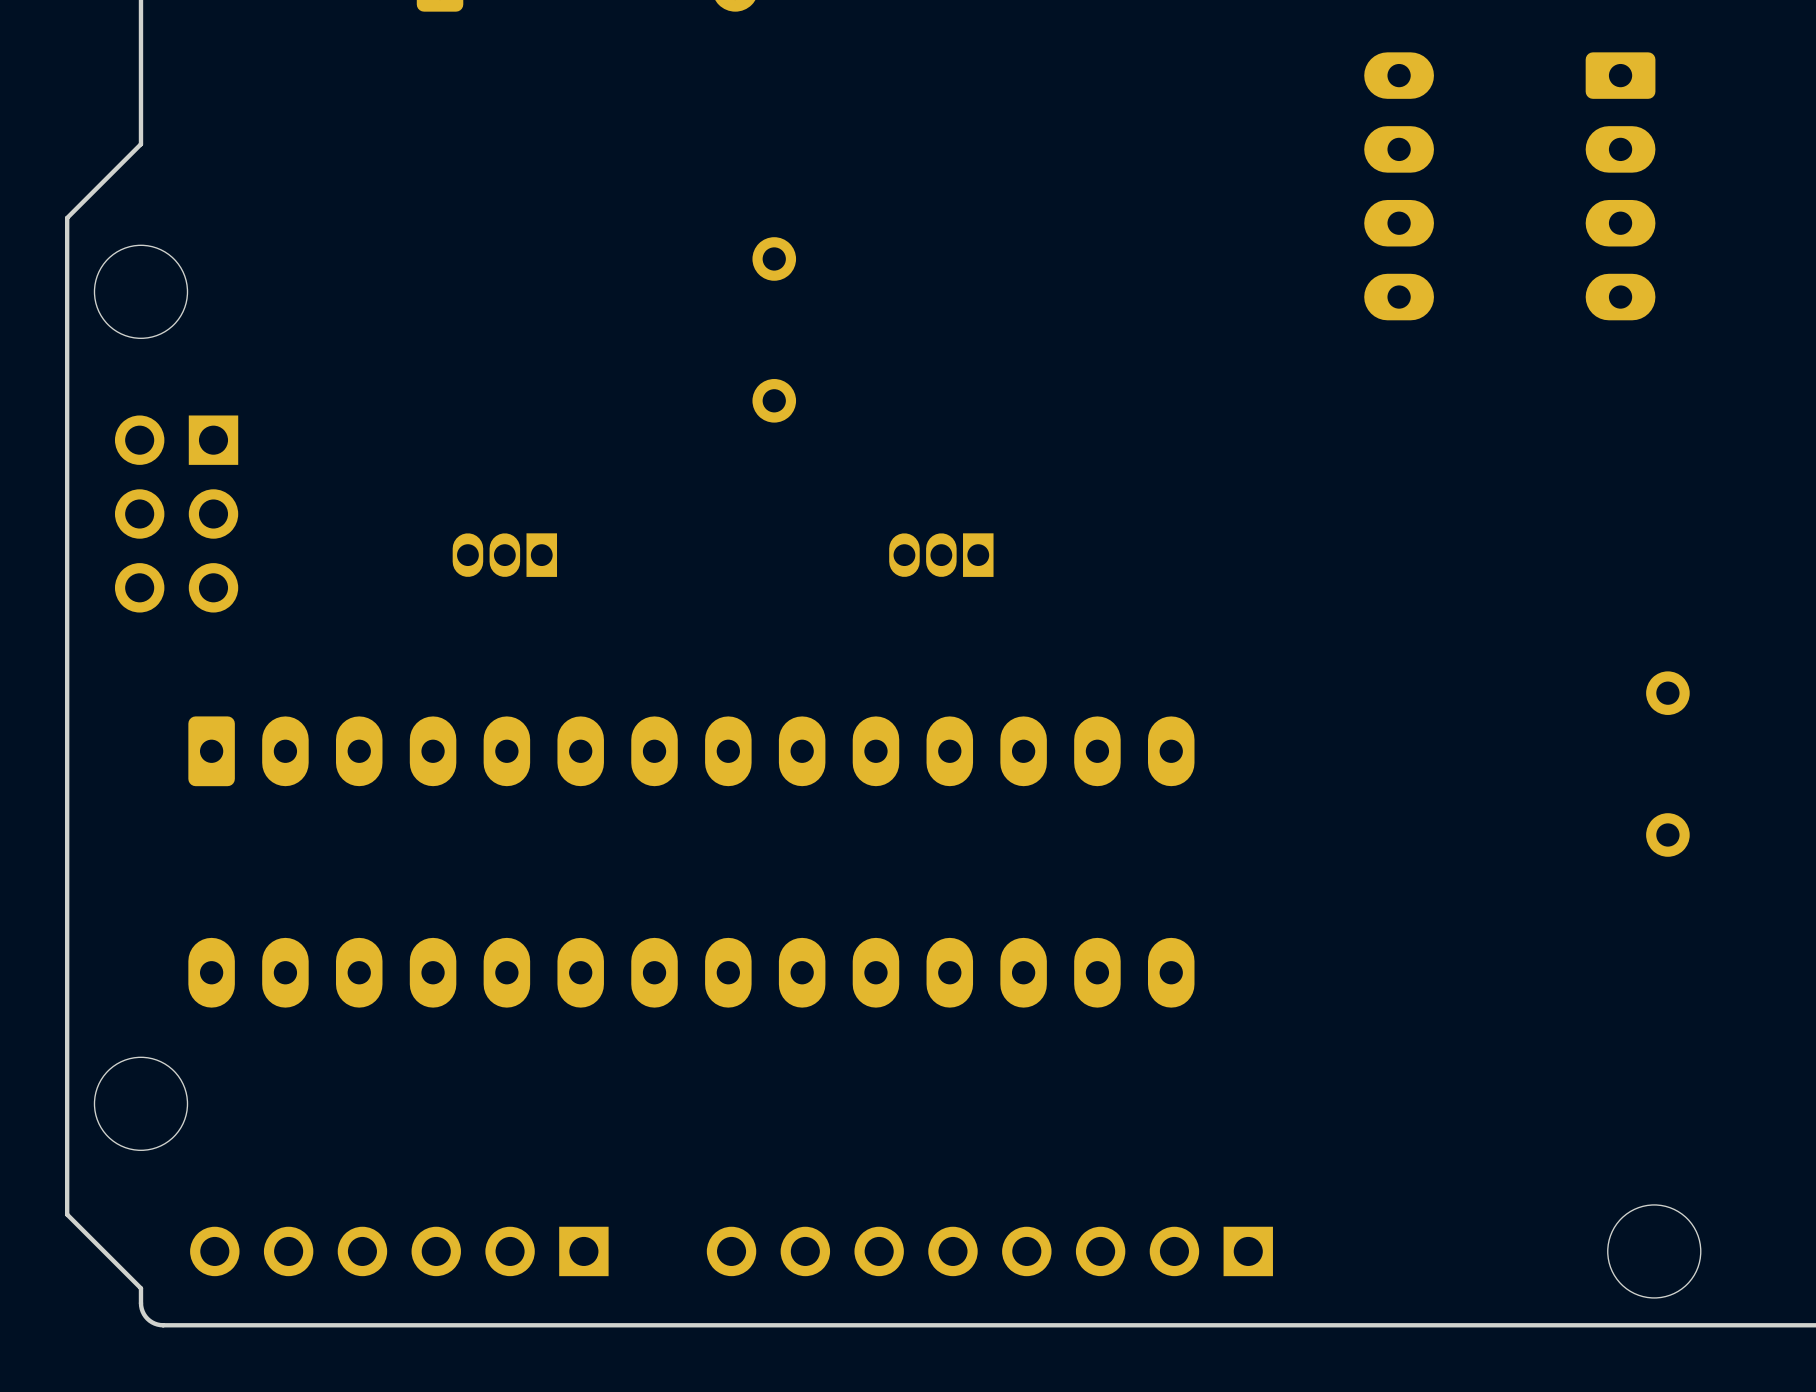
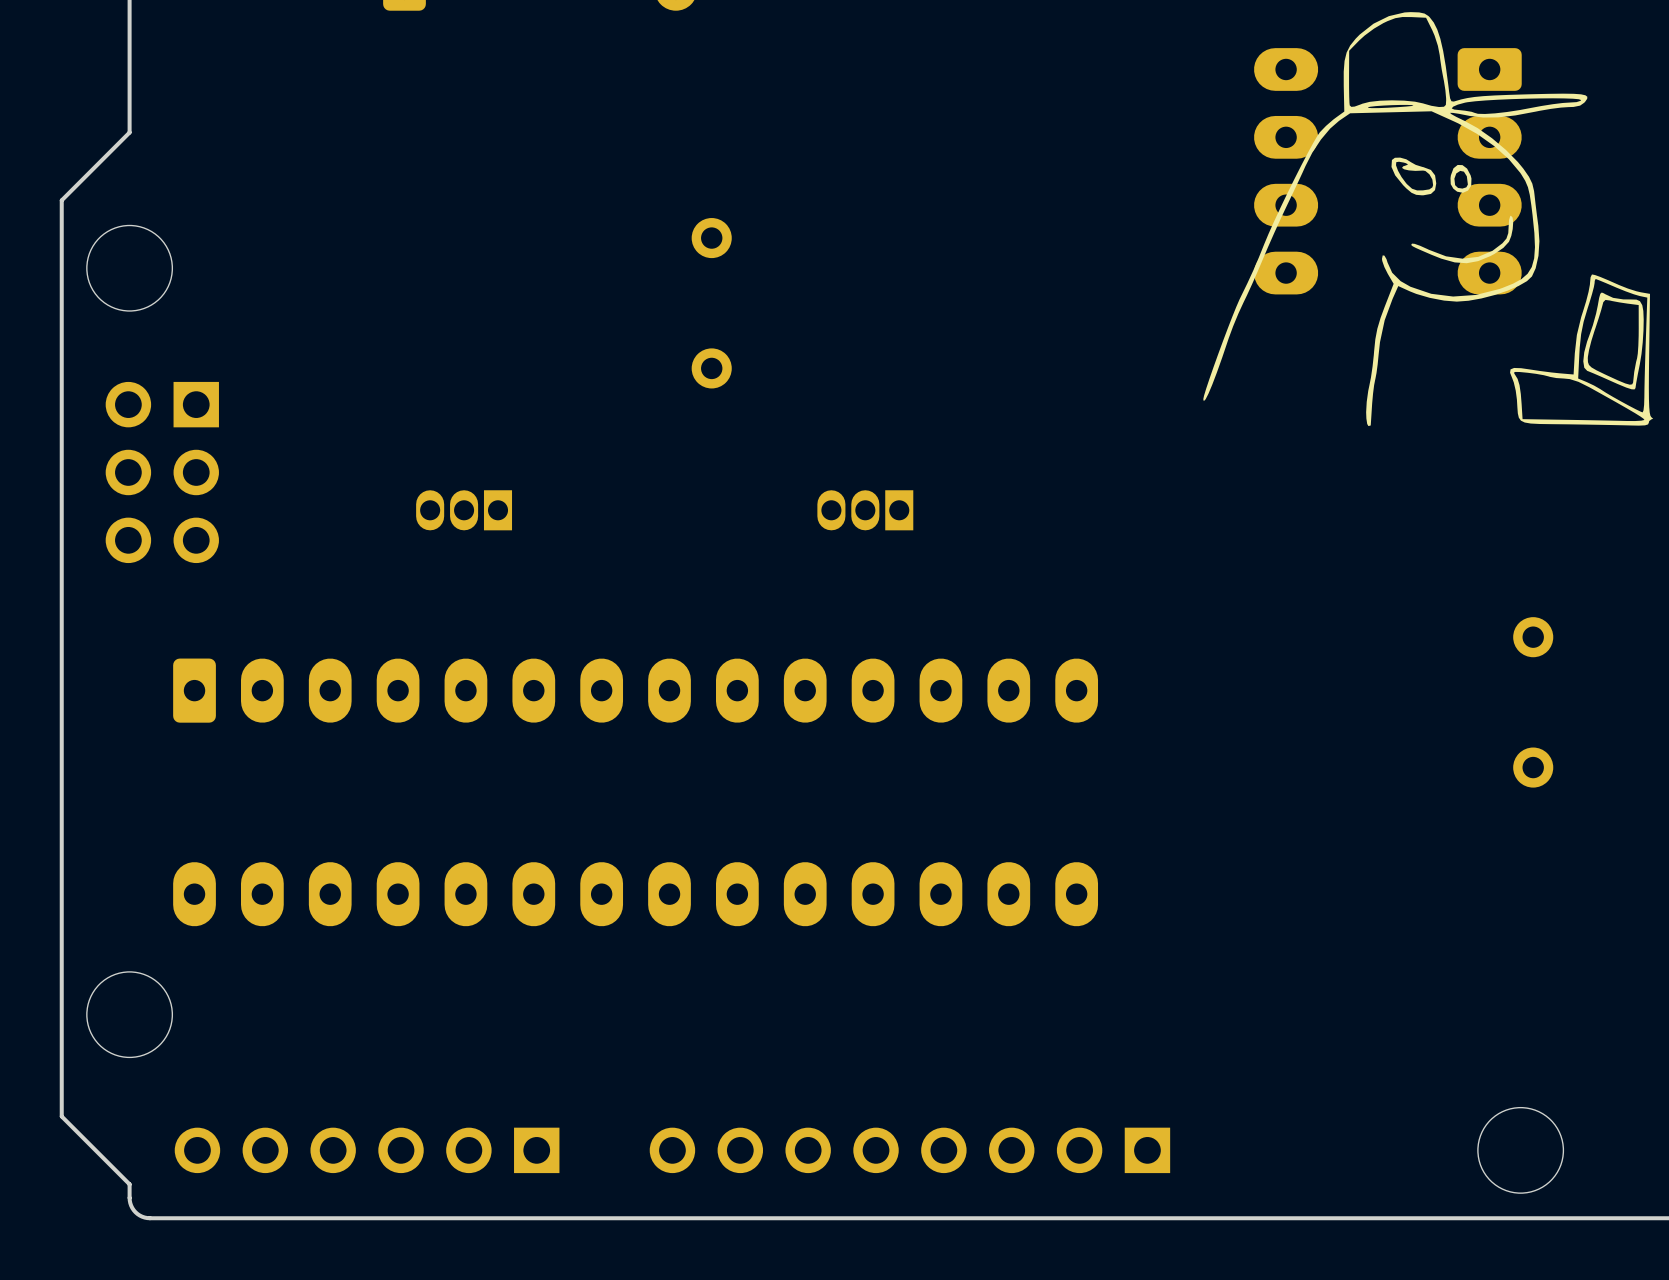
drawing: none -> [1203, 12, 1654, 427]

